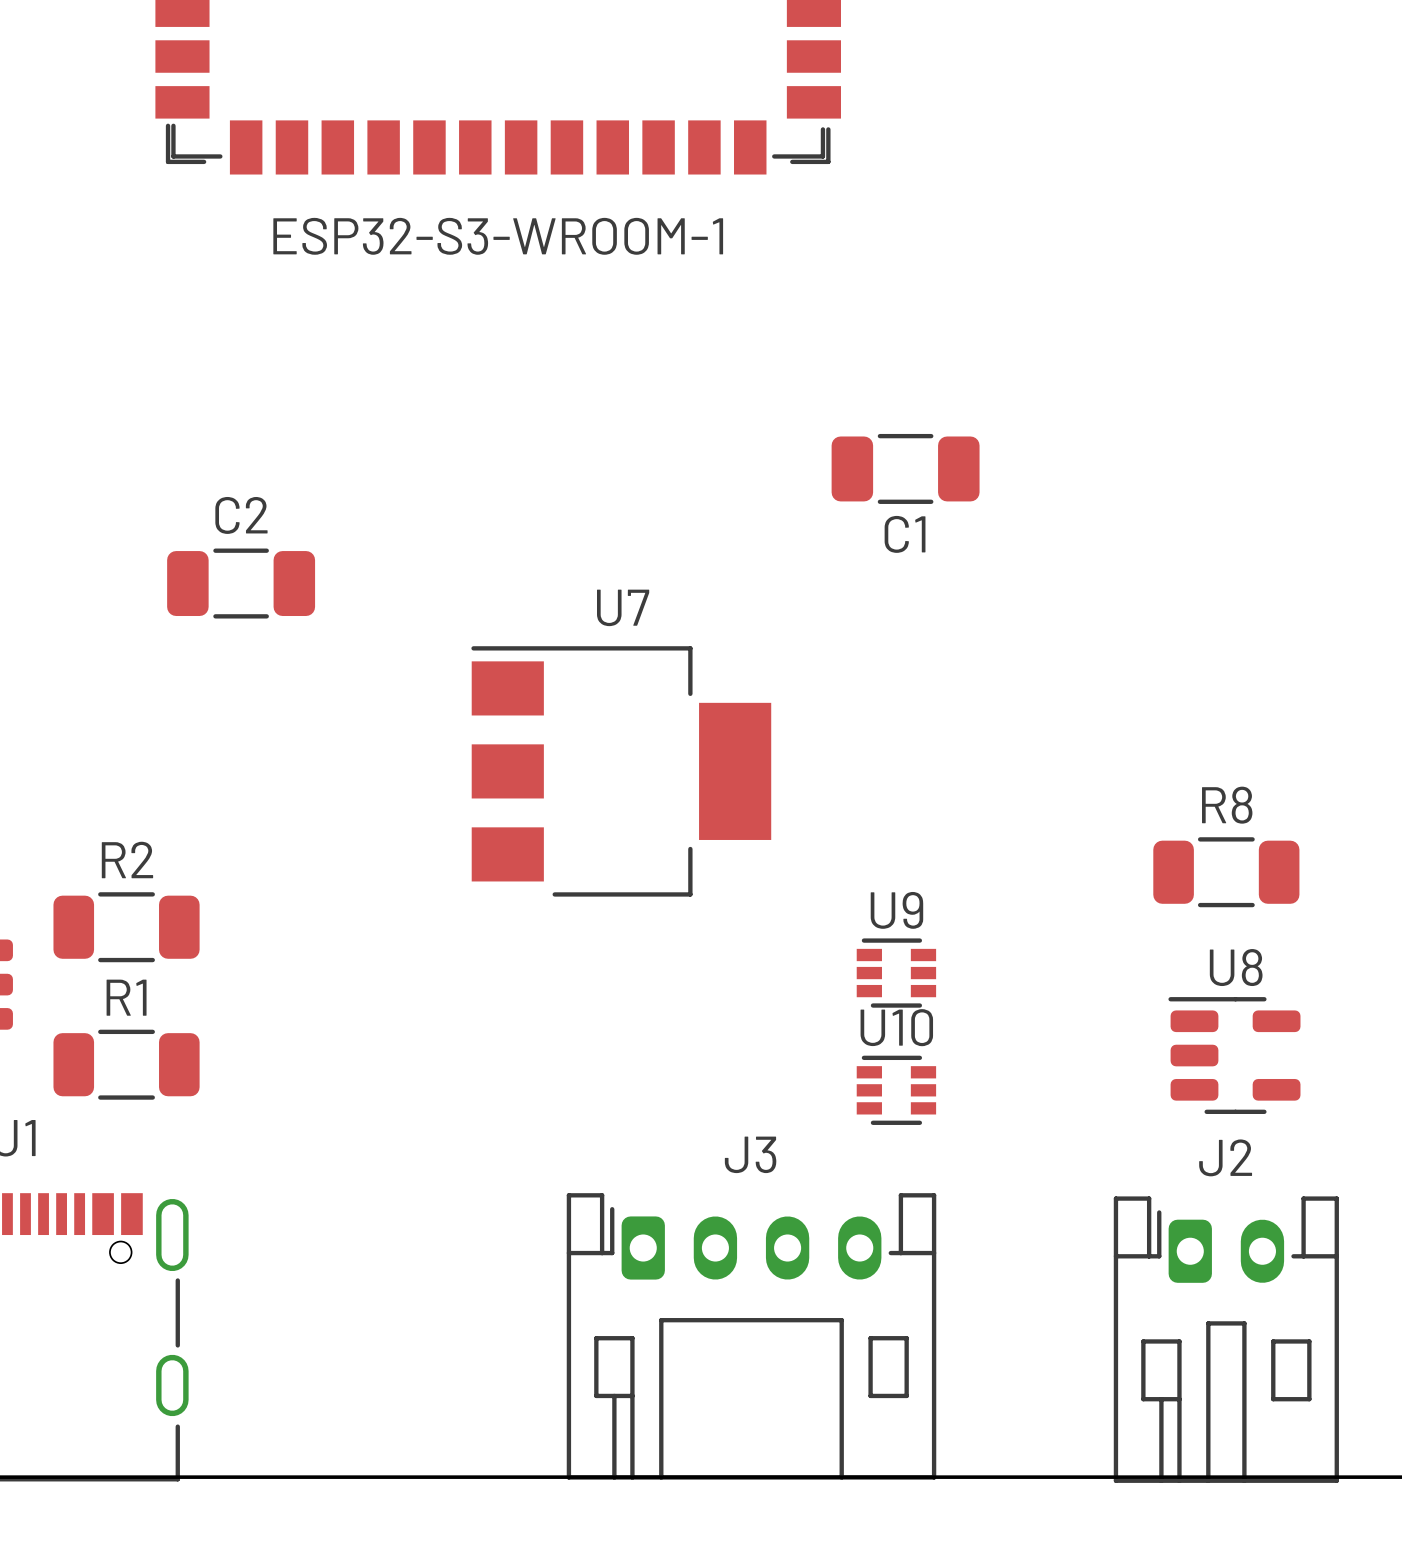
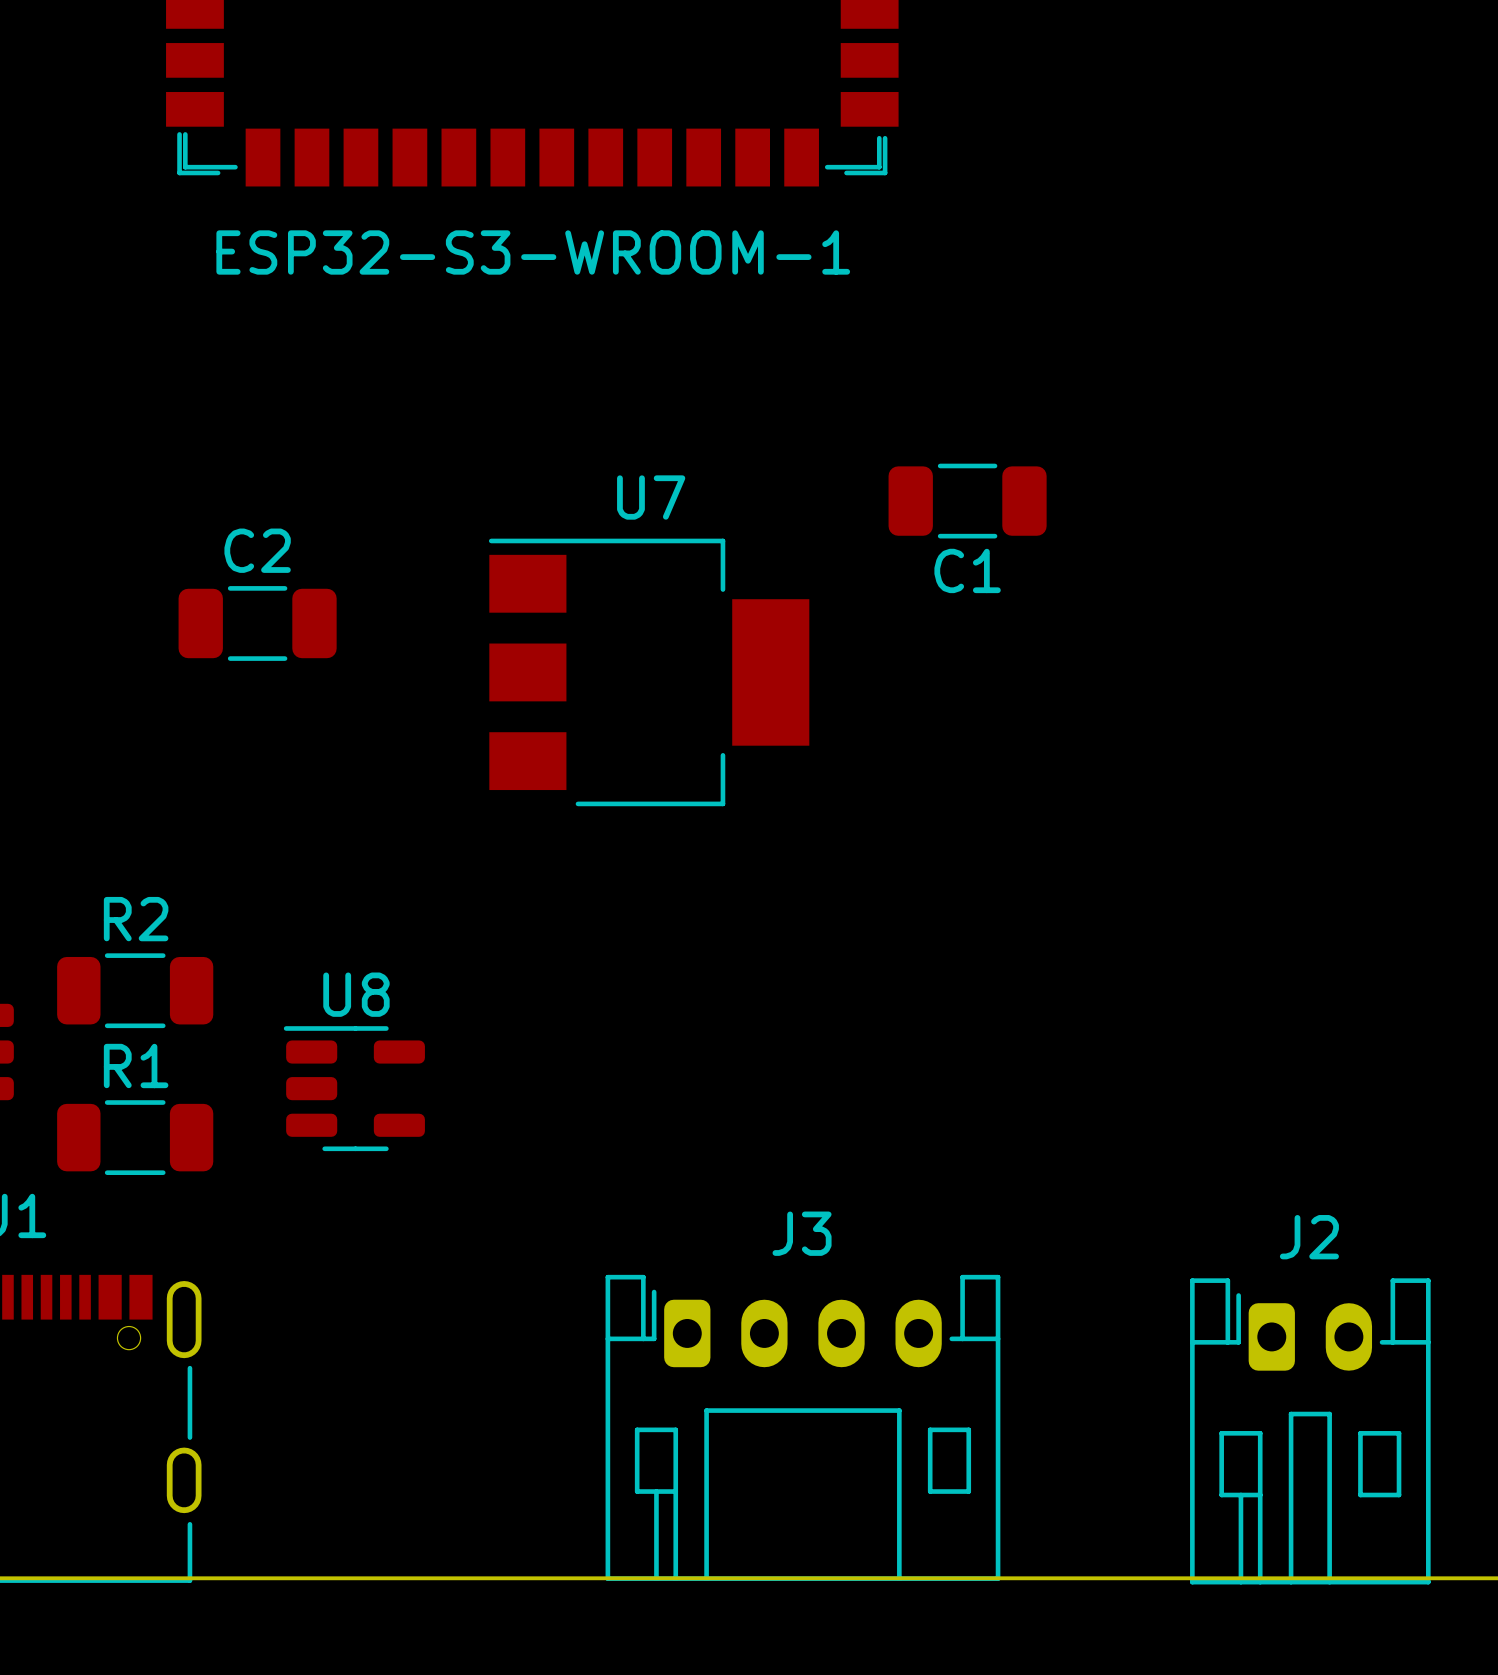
U7 position: (621, 771) -> (649, 672)
R8: (1226, 872) -> none
U9: (896, 973) -> none
U8 position: (1234, 1055) -> (354, 1088)
U10: (896, 1090) -> none

